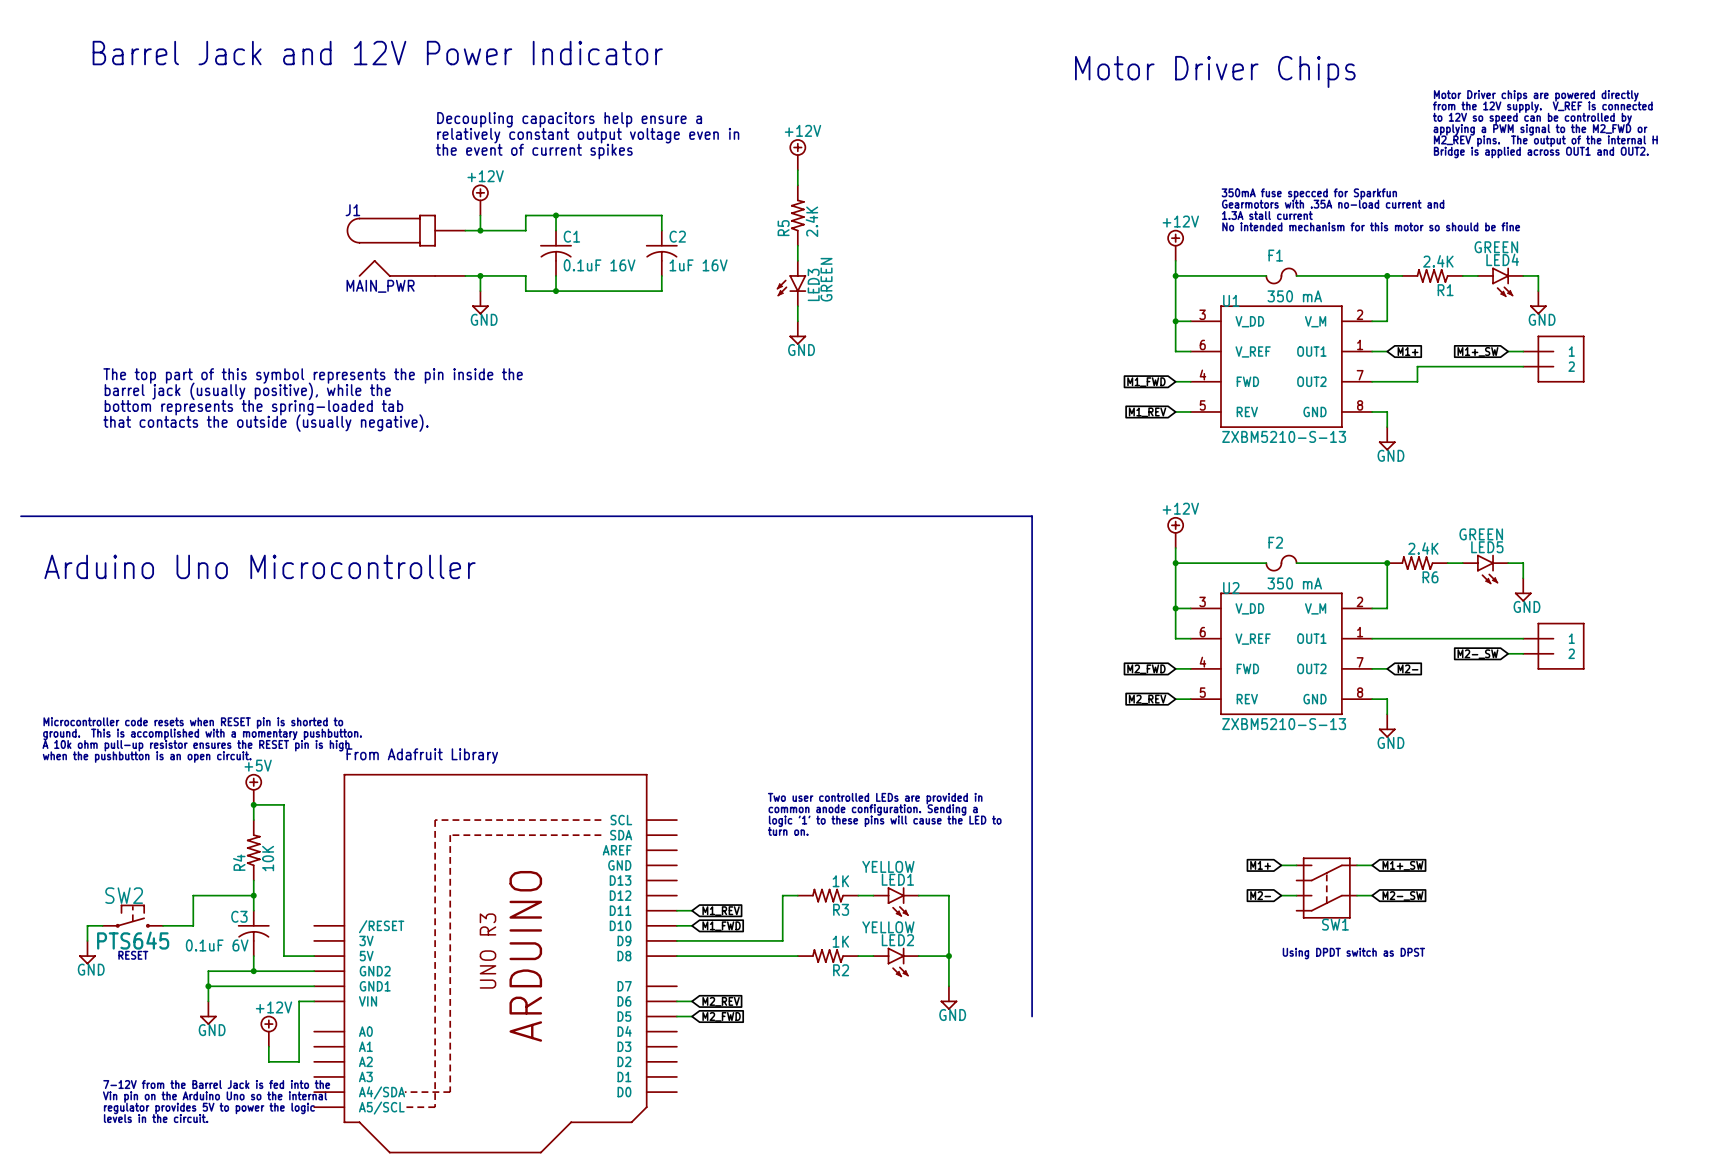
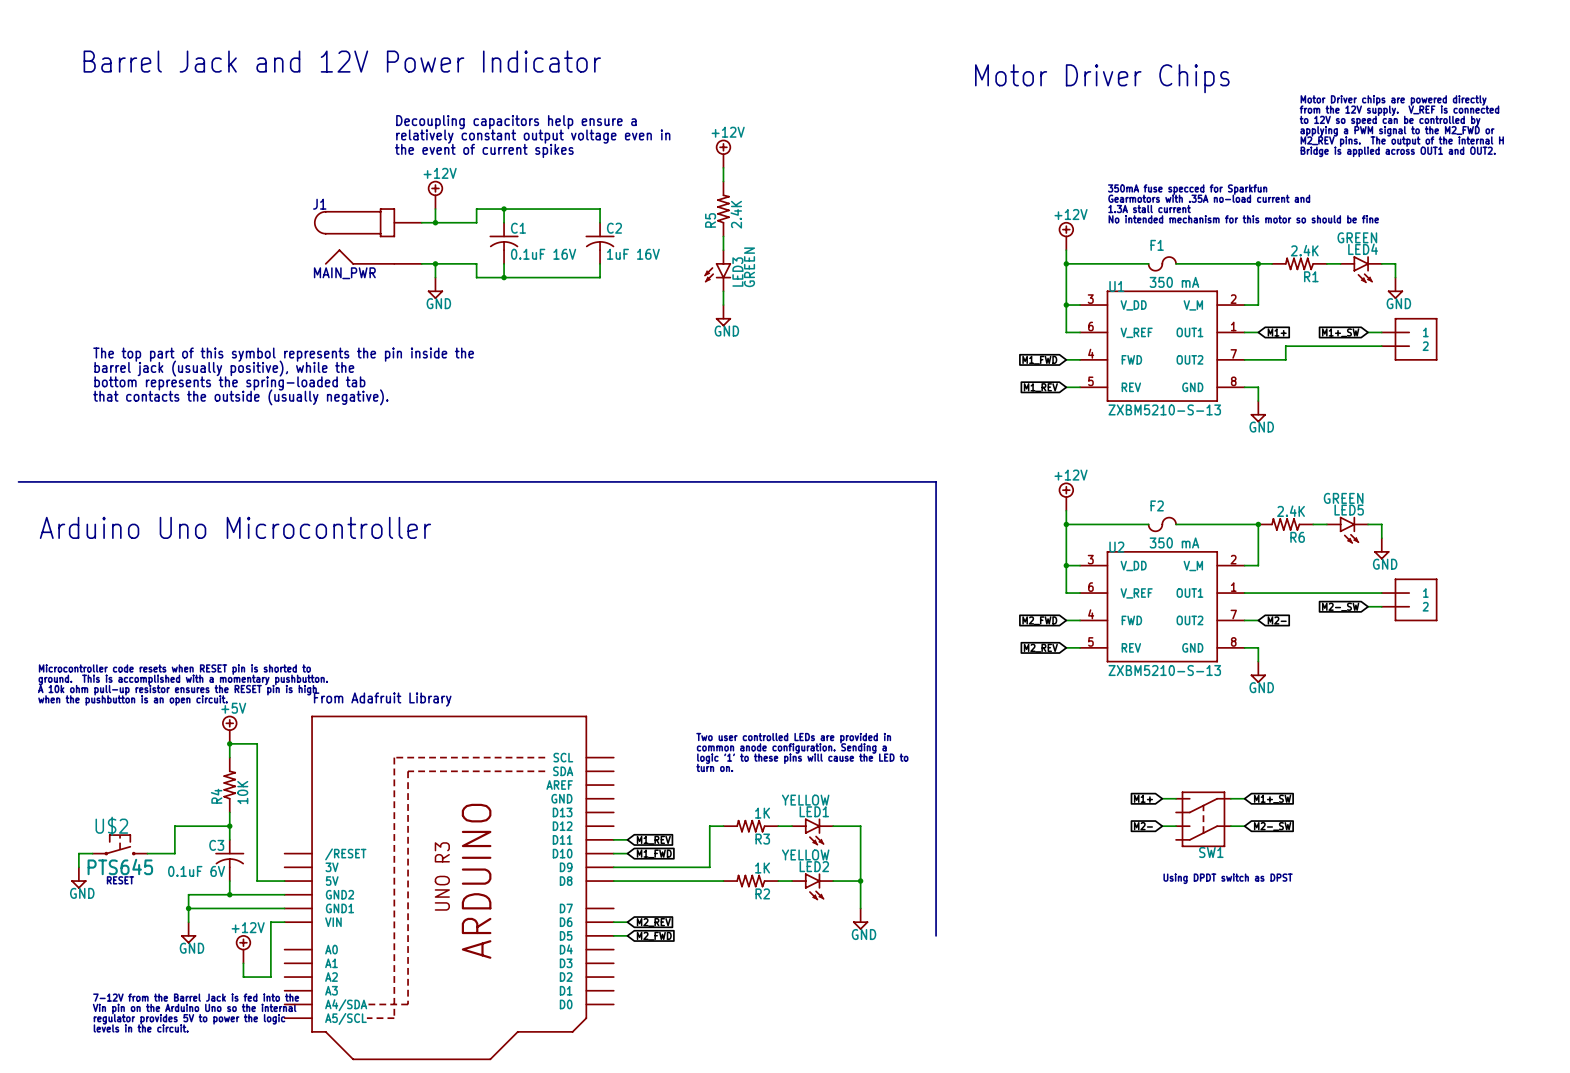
SW2 name: SW2 (124, 895) -> U$2 (111, 826)

